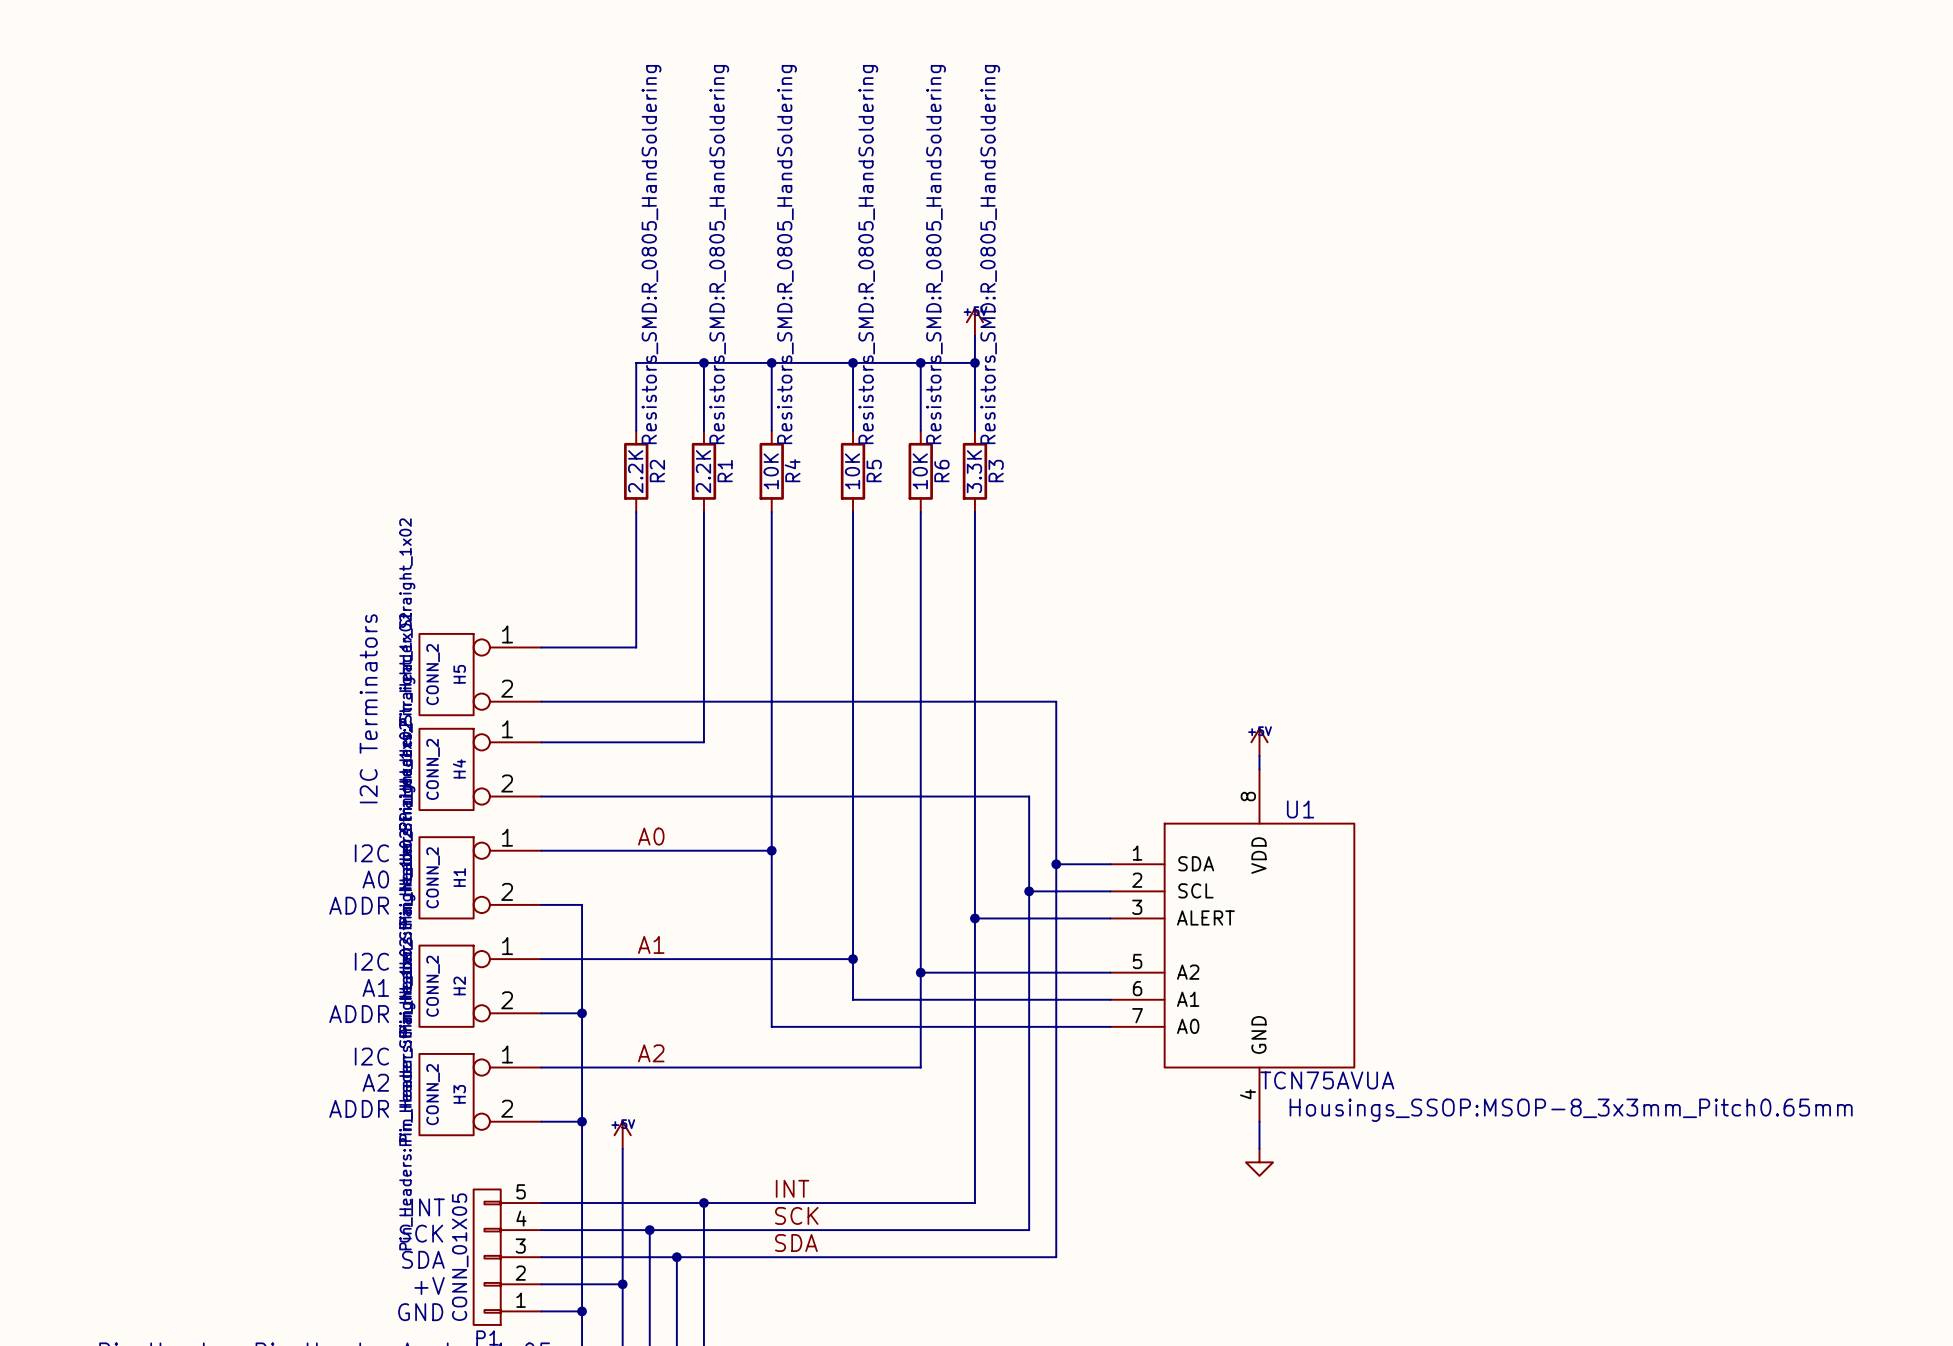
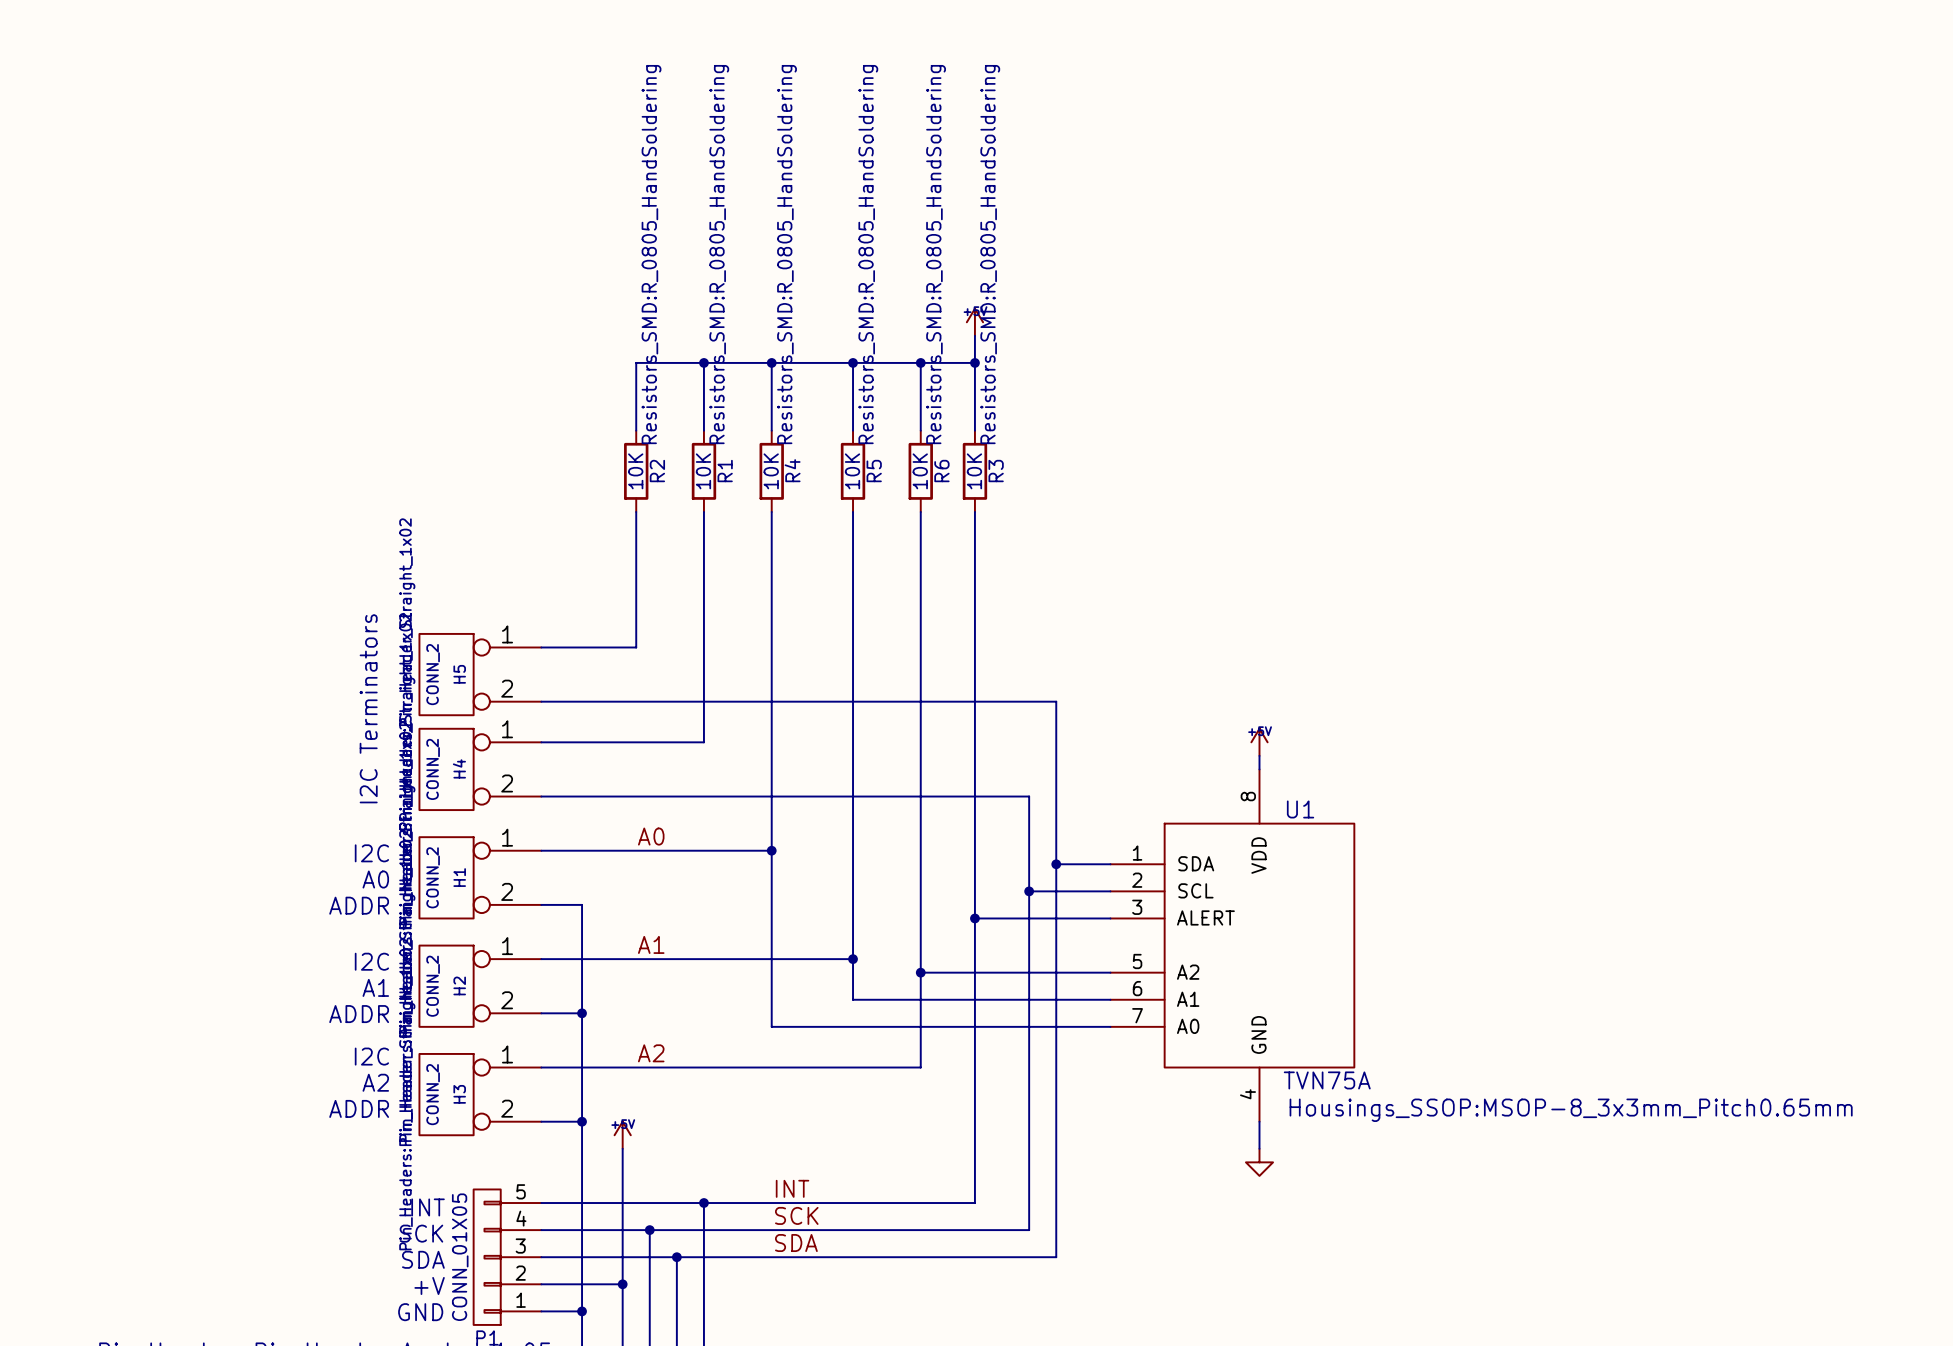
R2 value: 2.2K (635, 471) -> 10K (635, 471)
R1 value: 2.2K (703, 471) -> 10K (703, 471)
R3 value: 3.3K (974, 471) -> 10K (974, 471)
U1 value: TCN75AVUA (1327, 1080) -> TVN75A (1327, 1080)

